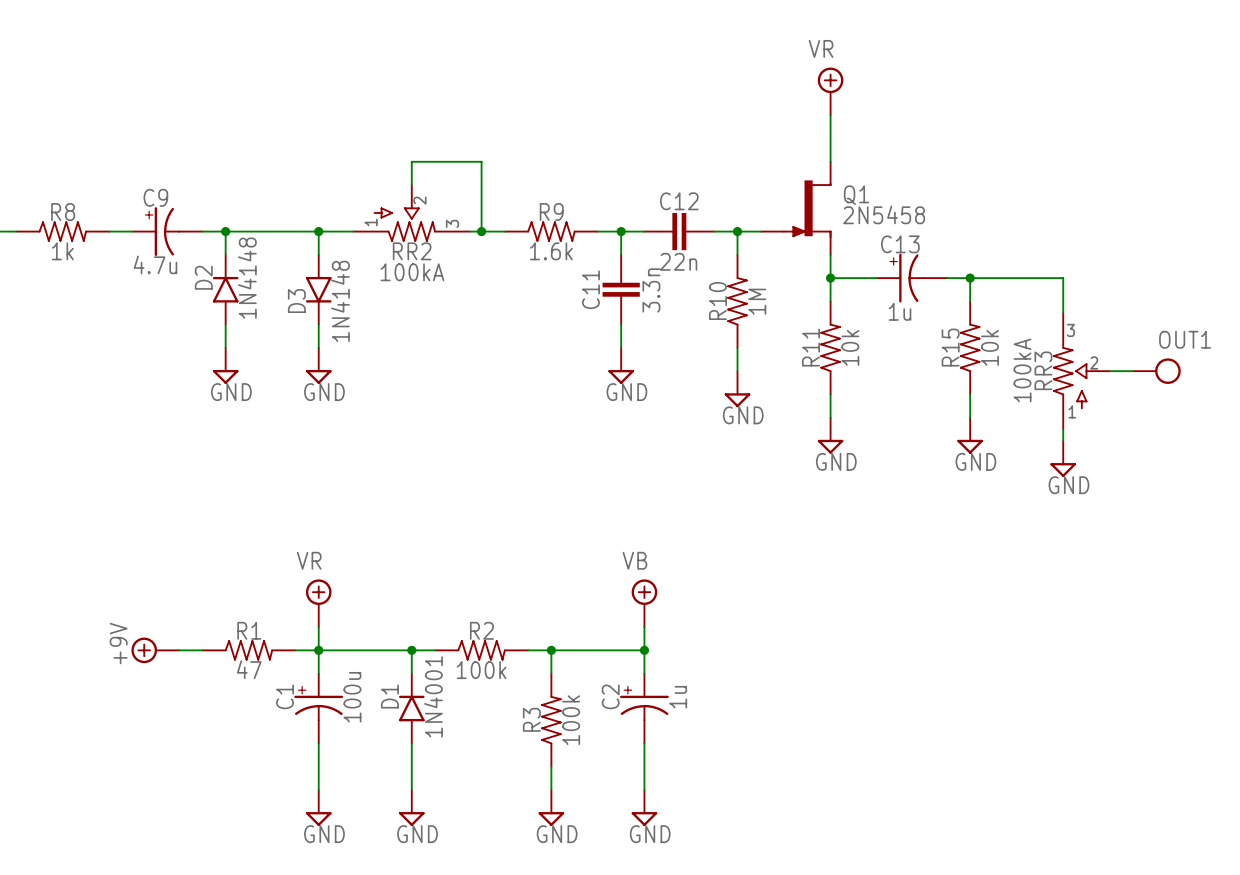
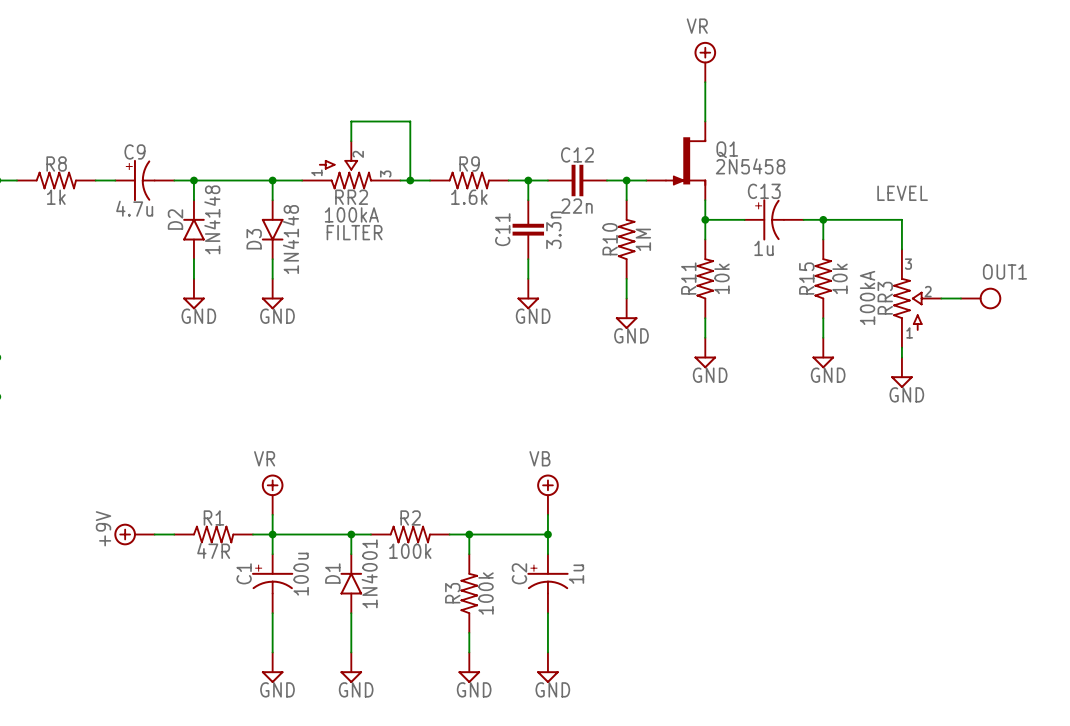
text: none -> LEVEL (902, 193)
text: none -> FILTER (354, 232)
R1 value: 47 (249, 669) -> 47R (213, 550)

